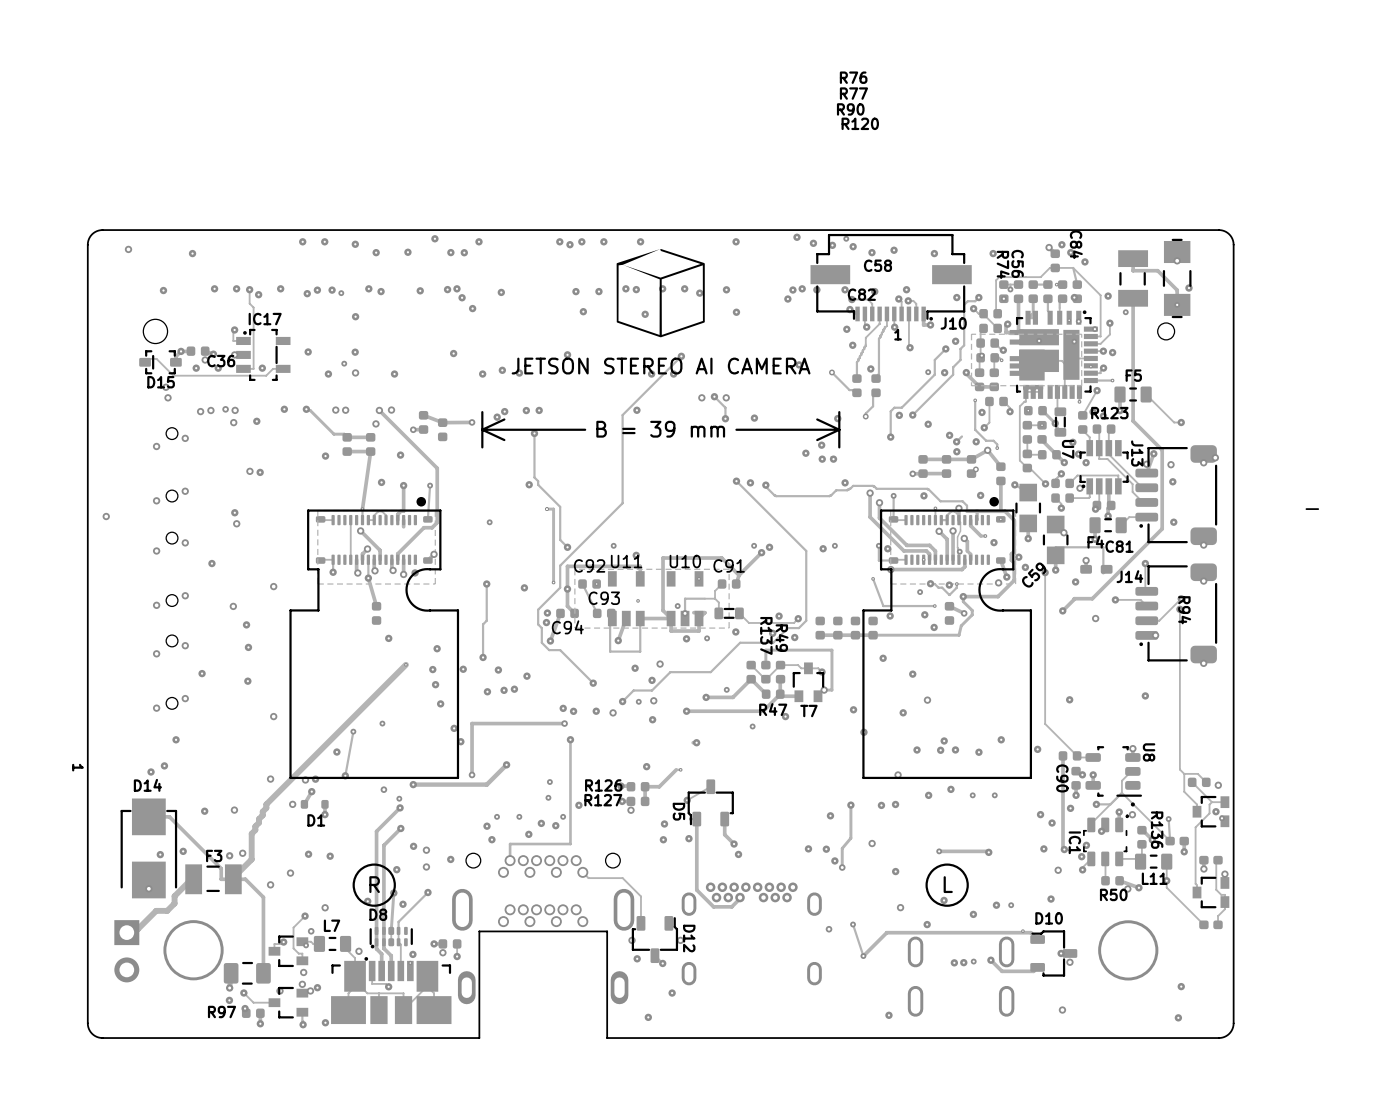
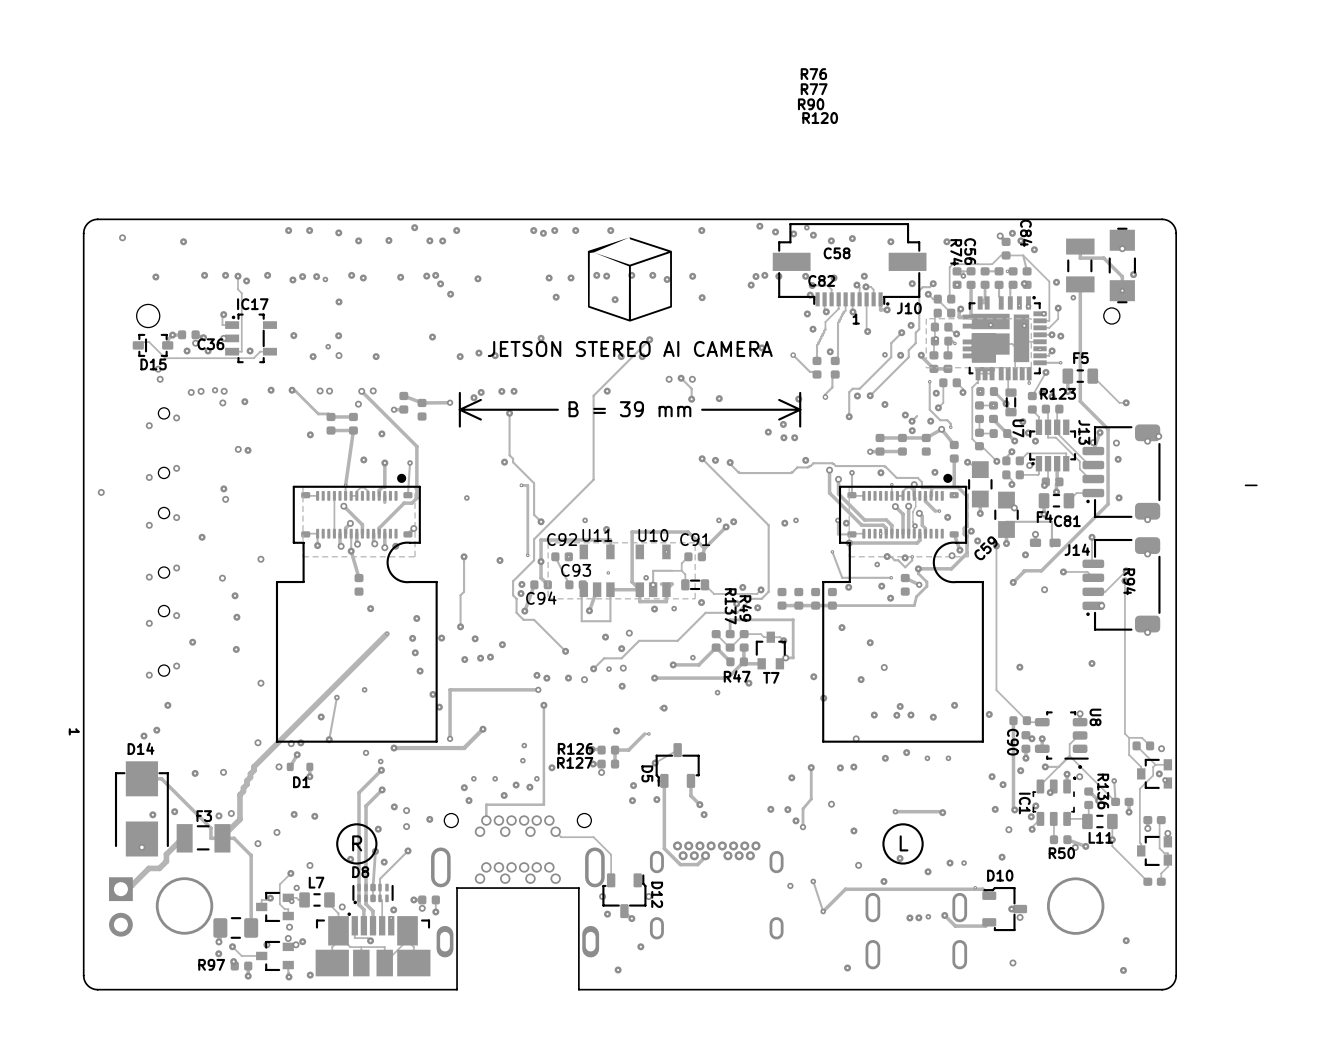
via: (975, 469) -> none

